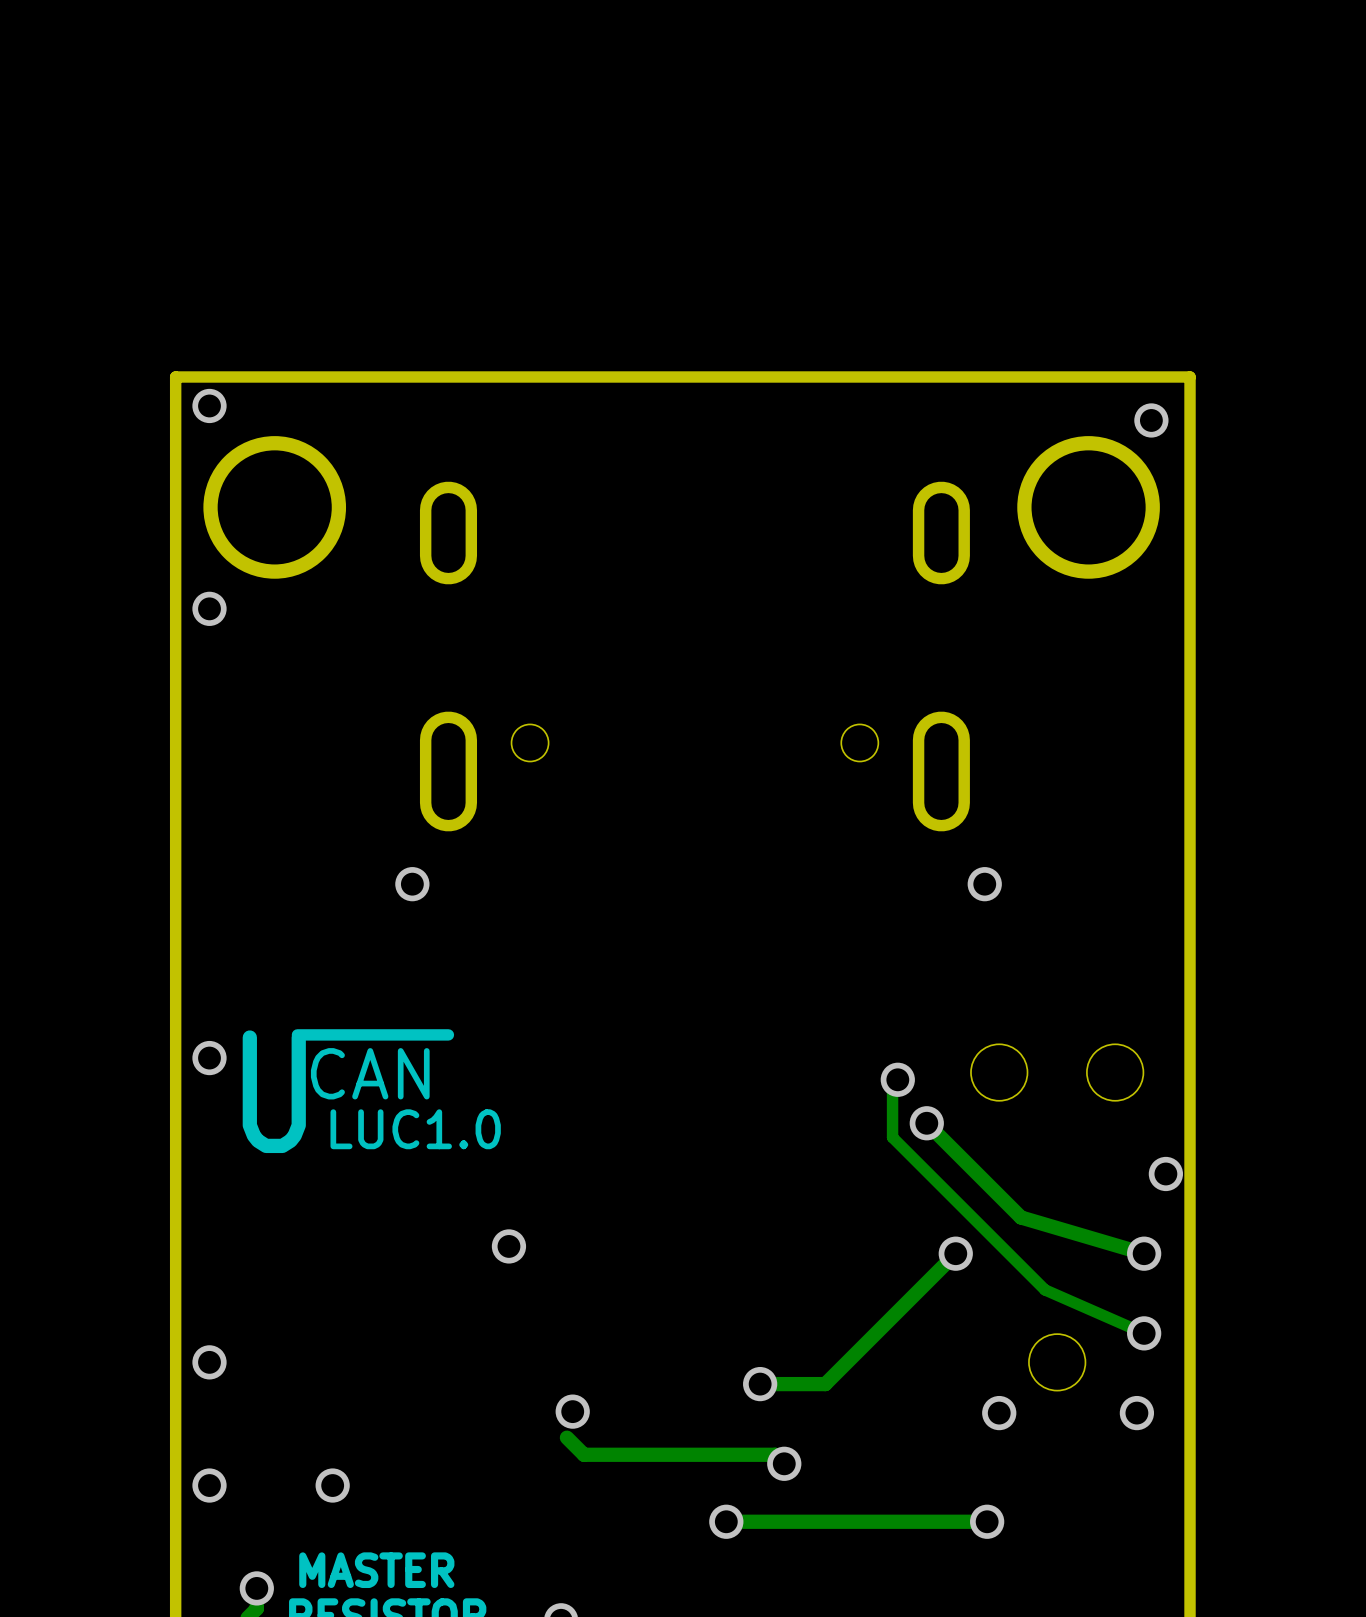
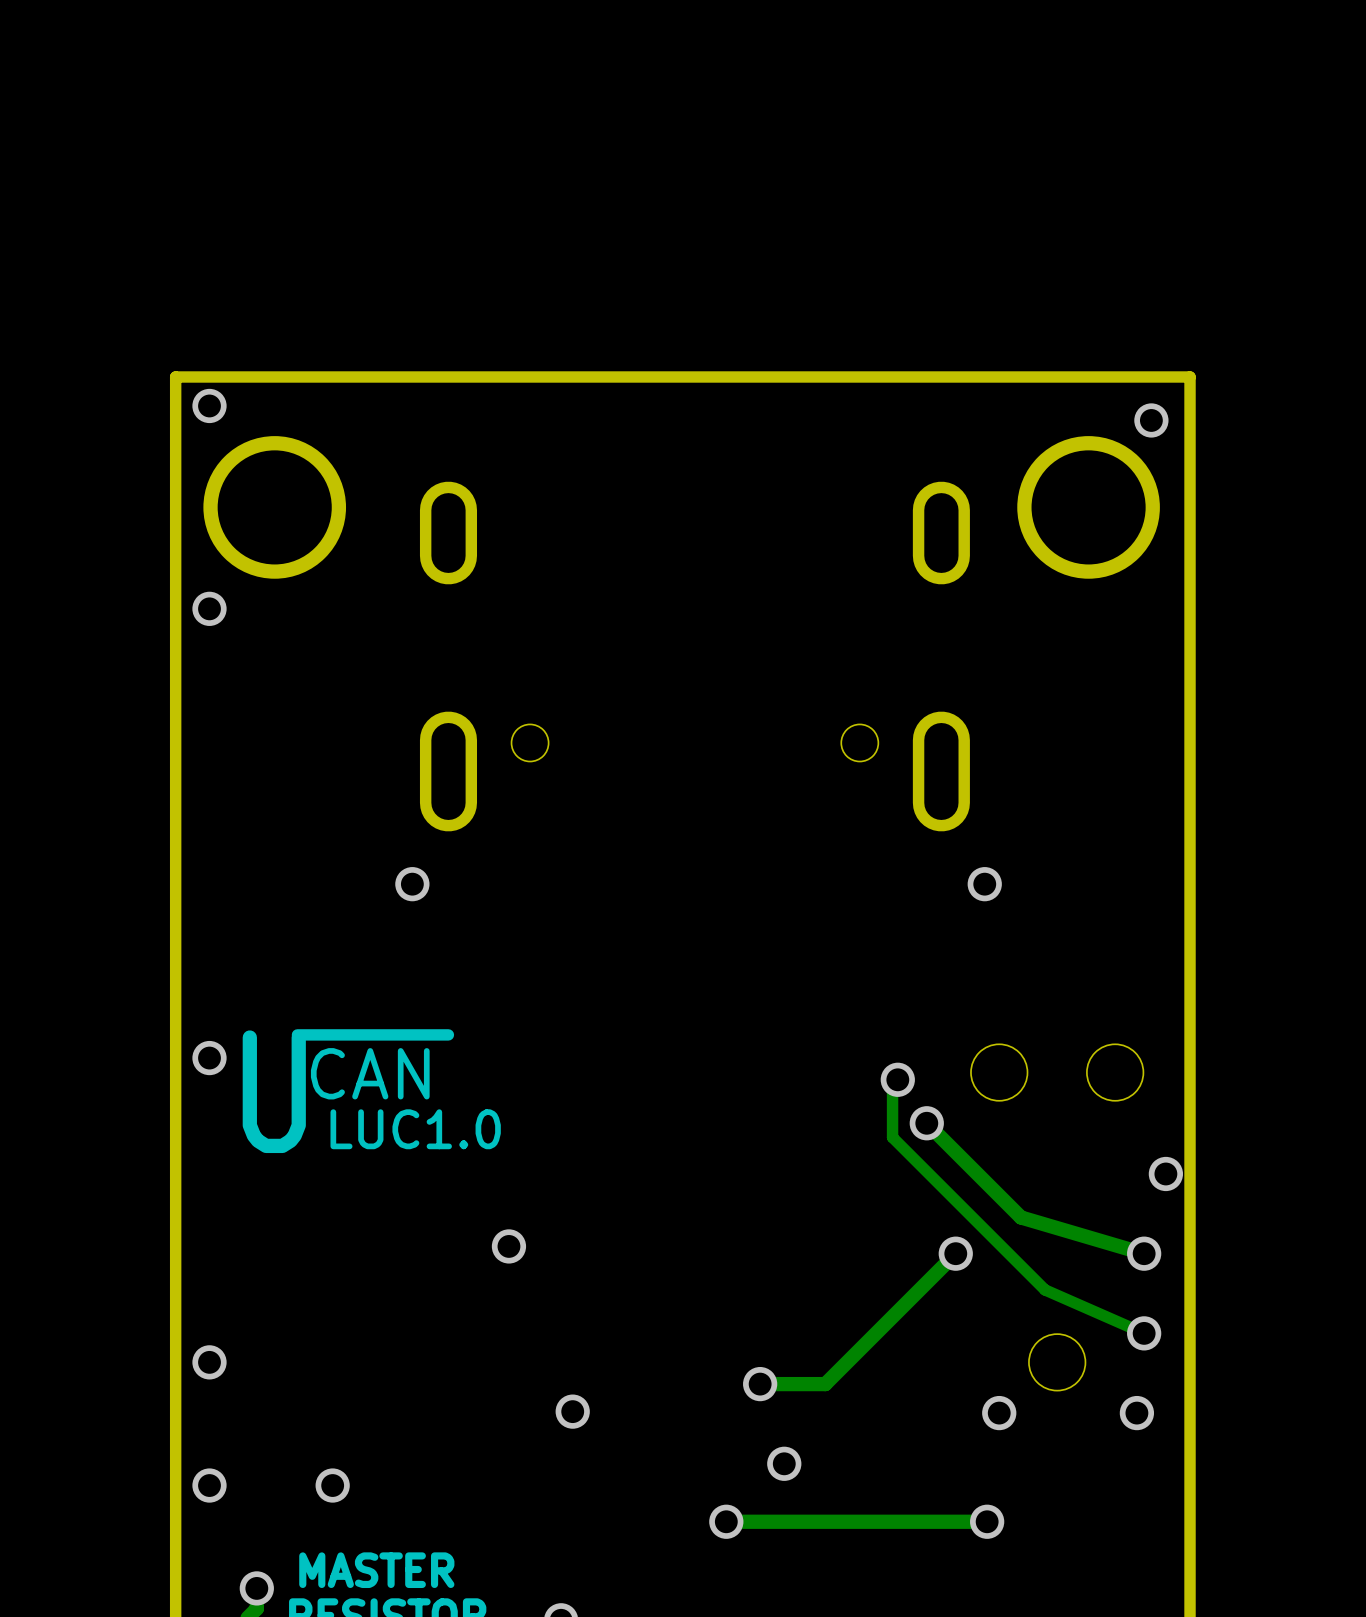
track: (566, 1437) (584, 1454) (775, 1454) (784, 1463) -> none

